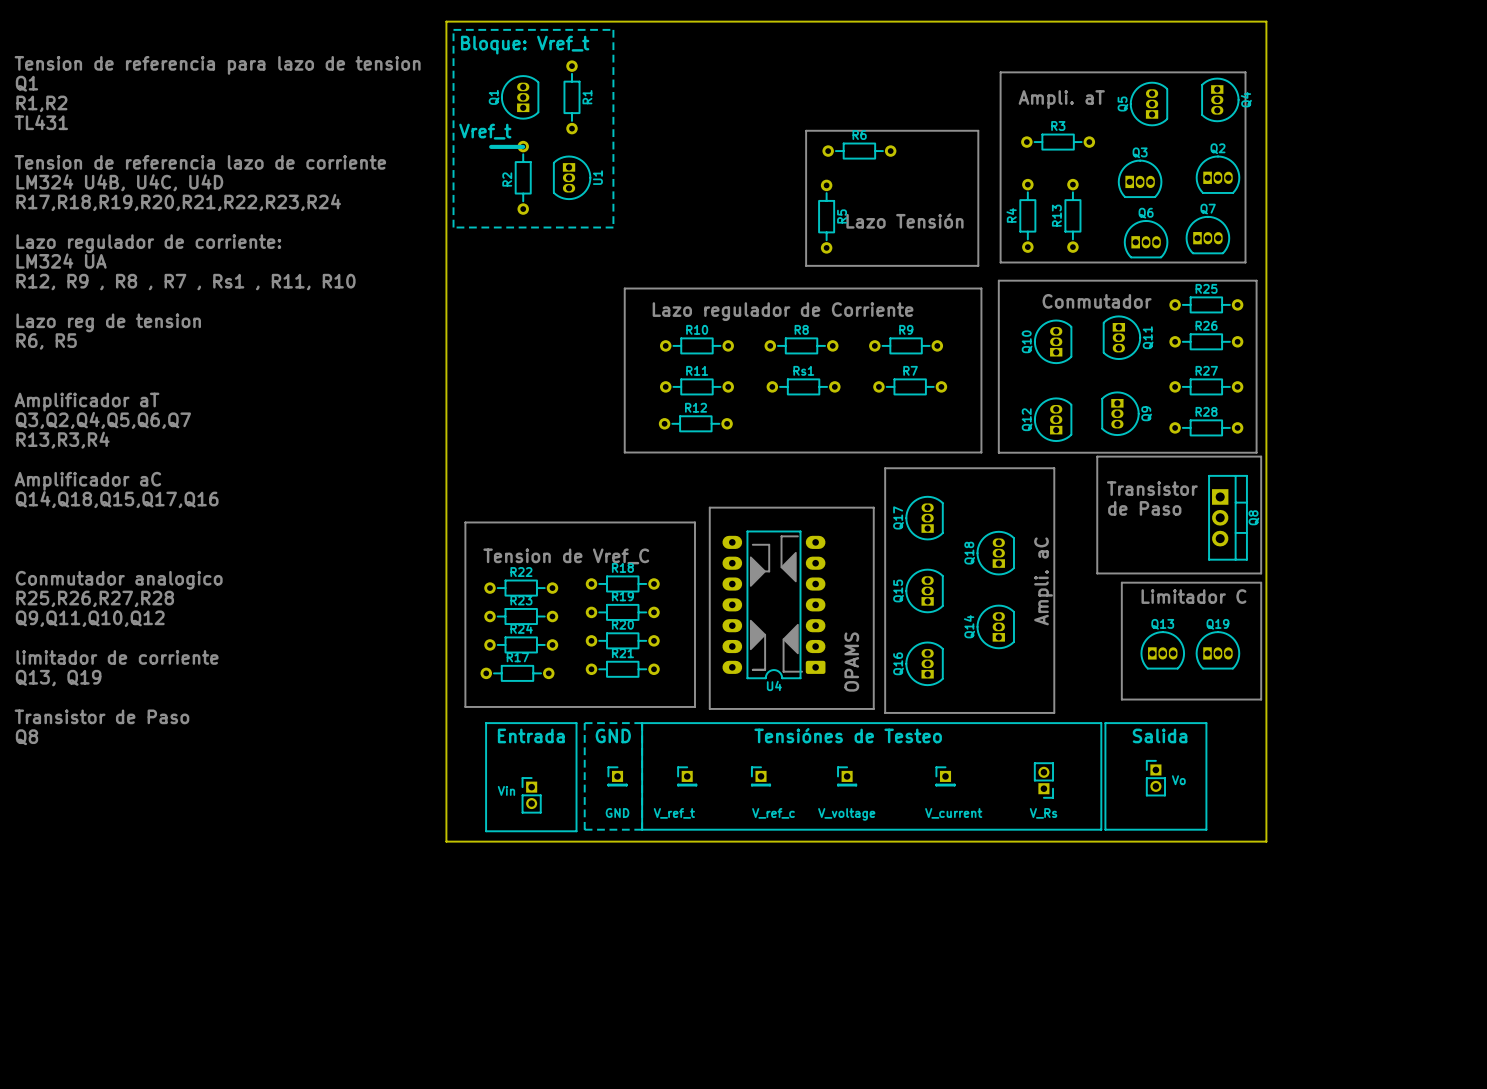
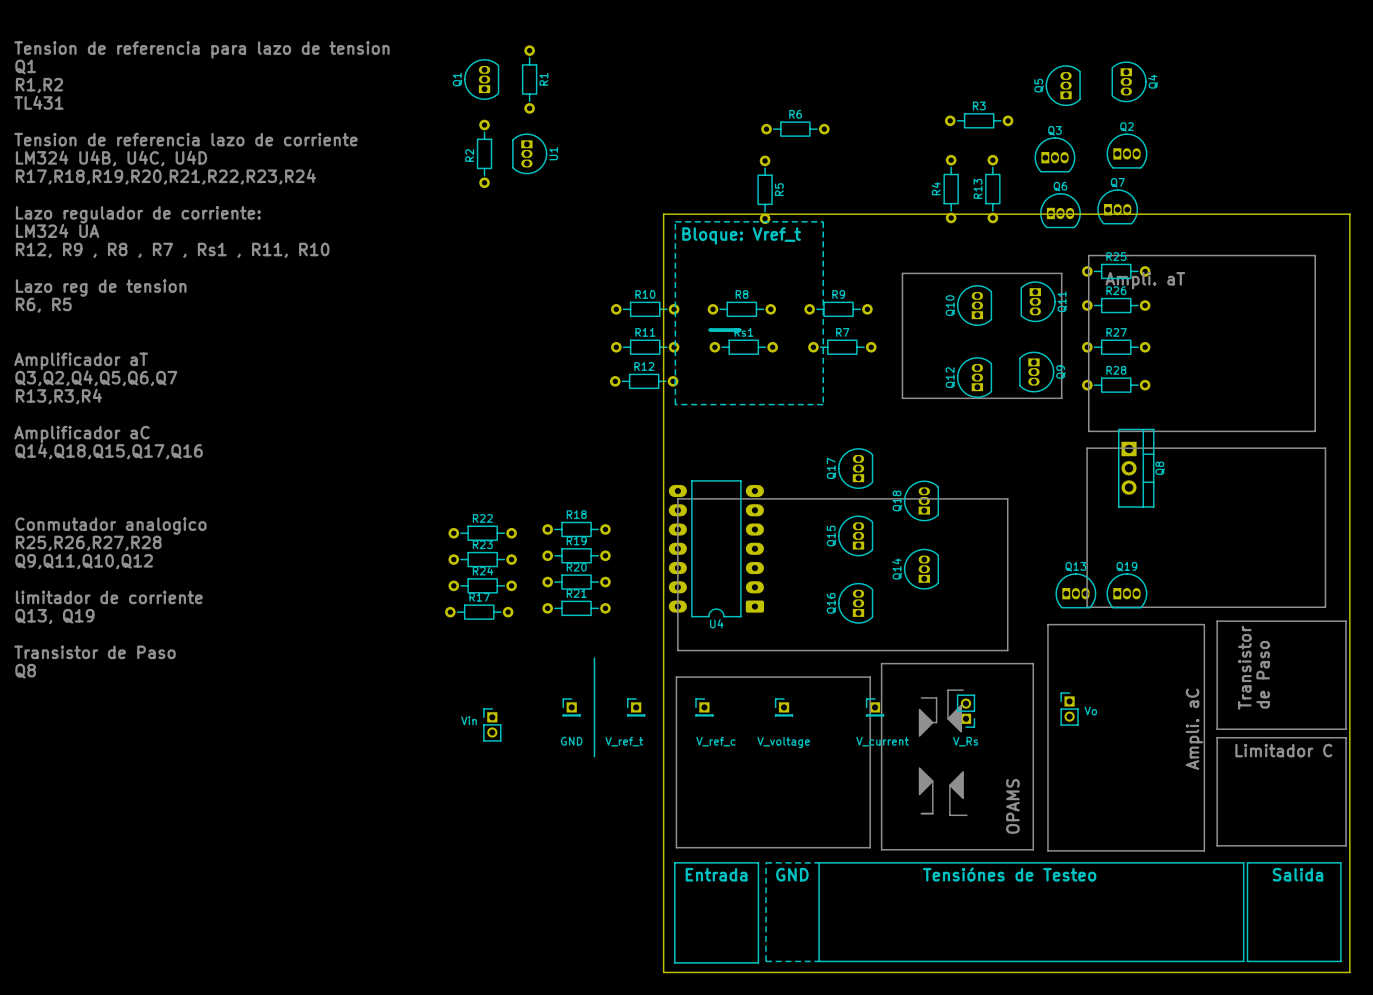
board edge: (446, 21) (1266, 21) (1266, 841) (446, 841) (446, 21) -> none
line: (453, 29) (613, 29) (613, 227) (453, 227) (453, 29) -> none
text: Bloque: Vref_t (525, 45) -> none
line: (1000, 72) (1245, 72) (1245, 262) (1000, 262) (1000, 72) -> none
text: Ampli. aT (1061, 99) -> none
line: (806, 130) (978, 130) (978, 265) (806, 265) (806, 130) -> none
text: Vref_t (485, 131) -> none
line: (491, 146) (523, 146) -> none
text: Lazo Tensión (904, 221) -> none
board edge: none -> (663, 214) (1349, 214) (1349, 972) (663, 972) (663, 214)
line: none -> (675, 221) (823, 221) (823, 404) (675, 404) (675, 221)
text: none -> Bloque: Vref_t (741, 235)
line: (998, 280) (1256, 280) (1256, 452) (998, 452) (998, 280) -> none
line: none -> (1088, 255) (1315, 255) (1315, 431) (1088, 431) (1088, 255)
line: (624, 288) (981, 288) (981, 452) (624, 452) (624, 288) -> none
text: Conmutador (1097, 301) -> none
line: none -> (902, 273) (1061, 273) (1061, 398) (902, 398) (902, 273)
text: Lazo regulador de Corriente (783, 311) -> none
text: none -> Ampli. aT (1145, 280)
line: none -> (710, 330) (739, 330)
line: (1097, 456) (1261, 456) (1261, 573) (1097, 573) (1097, 456) -> none
line: (885, 468) (1054, 468) (1054, 712) (885, 712) (885, 468) -> none
text: Transistor (1152, 488) -> none
line: none -> (1087, 448) (1325, 448) (1325, 607) (1087, 607) (1087, 448)
line: (709, 507) (873, 507) (873, 708) (709, 708) (709, 507) -> none
text: de Paso (1144, 508) -> none
line: (465, 522) (694, 522) (694, 706) (465, 706) (465, 522) -> none
line: (797, 536) (781, 536) (781, 567) -> none
line: (752, 544) (769, 544) (769, 571) (765, 571) -> none
line: none -> (677, 498) (1007, 498) (1007, 650) (677, 650) (677, 498)
drawing: [780, 551, 797, 583] -> none
text: Tension de Vref_C (566, 556) -> none
drawing: [749, 556, 766, 587] -> none
text: Ampli. aC (1043, 581) -> none
line: (1121, 582) (1261, 582) (1261, 699) (1121, 699) (1121, 582) -> none
text: Limitador C (1193, 596) -> none
drawing: [749, 619, 766, 651] -> none
drawing: [782, 623, 799, 655] -> none
line: (765, 634) (765, 669) (752, 669) -> none
line: (783, 639) (783, 671) (802, 671) -> none
text: OPAMS (851, 662) -> none
line: none -> (1217, 621) (1345, 621) (1345, 729) (1217, 729) (1217, 621)
line: none -> (1047, 624) (1204, 624) (1204, 850) (1047, 850) (1047, 624)
line: (486, 723) (576, 723) (576, 831) (486, 831) (486, 723) -> none
line: (642, 723) (584, 723) (584, 829) (642, 829) -> none
line: (642, 723) (1101, 723) (1101, 829) (642, 829) -> none
line: (1105, 723) (1206, 723) (1206, 829) (1105, 829) (1105, 723) -> none
line: none -> (881, 663) (1033, 663) (1033, 849) (881, 849) (881, 663)
text: none -> Transistor (1244, 667)
text: Entrada (531, 735) -> none
text: GND (613, 735) -> none
text: Tensiónes de Testeo (848, 735) -> none
text: Salida (1160, 735) -> none
text: none -> de Paso (1263, 674)
line: none -> (676, 677) (870, 677) (870, 847) (676, 847) (676, 677)
line: none -> (963, 690) (947, 690) (947, 718)
line: none -> (921, 697) (936, 697) (936, 722) (932, 722)
drawing: none -> [947, 704, 962, 733]
drawing: none -> [918, 708, 934, 737]
text: none -> Ampli. aC (1194, 729)
line: none -> (1217, 737) (1217, 845) (1346, 845) (1346, 737) (1217, 737)
text: none -> Limitador C (1283, 750)
drawing: none -> [918, 767, 934, 796]
drawing: none -> [949, 771, 964, 800]
line: none -> (932, 781) (932, 813) (921, 813)
line: none -> (949, 785) (949, 815) (966, 815)
text: none -> OPAMS (1012, 806)
line: none -> (674, 862) (758, 862) (758, 962) (674, 962) (674, 862)
line: none -> (819, 862) (1243, 862) (1243, 961) (819, 961)
line: none -> (819, 862) (819, 961)
line: none -> (819, 862) (765, 862) (765, 961) (819, 961)
line: none -> (1247, 862) (1340, 862) (1340, 961) (1247, 961) (1247, 862)
text: none -> Entrada (716, 874)
text: none -> GND (792, 874)
text: none -> Tensiónes de Testeo (1009, 874)
text: none -> Salida (1297, 874)

